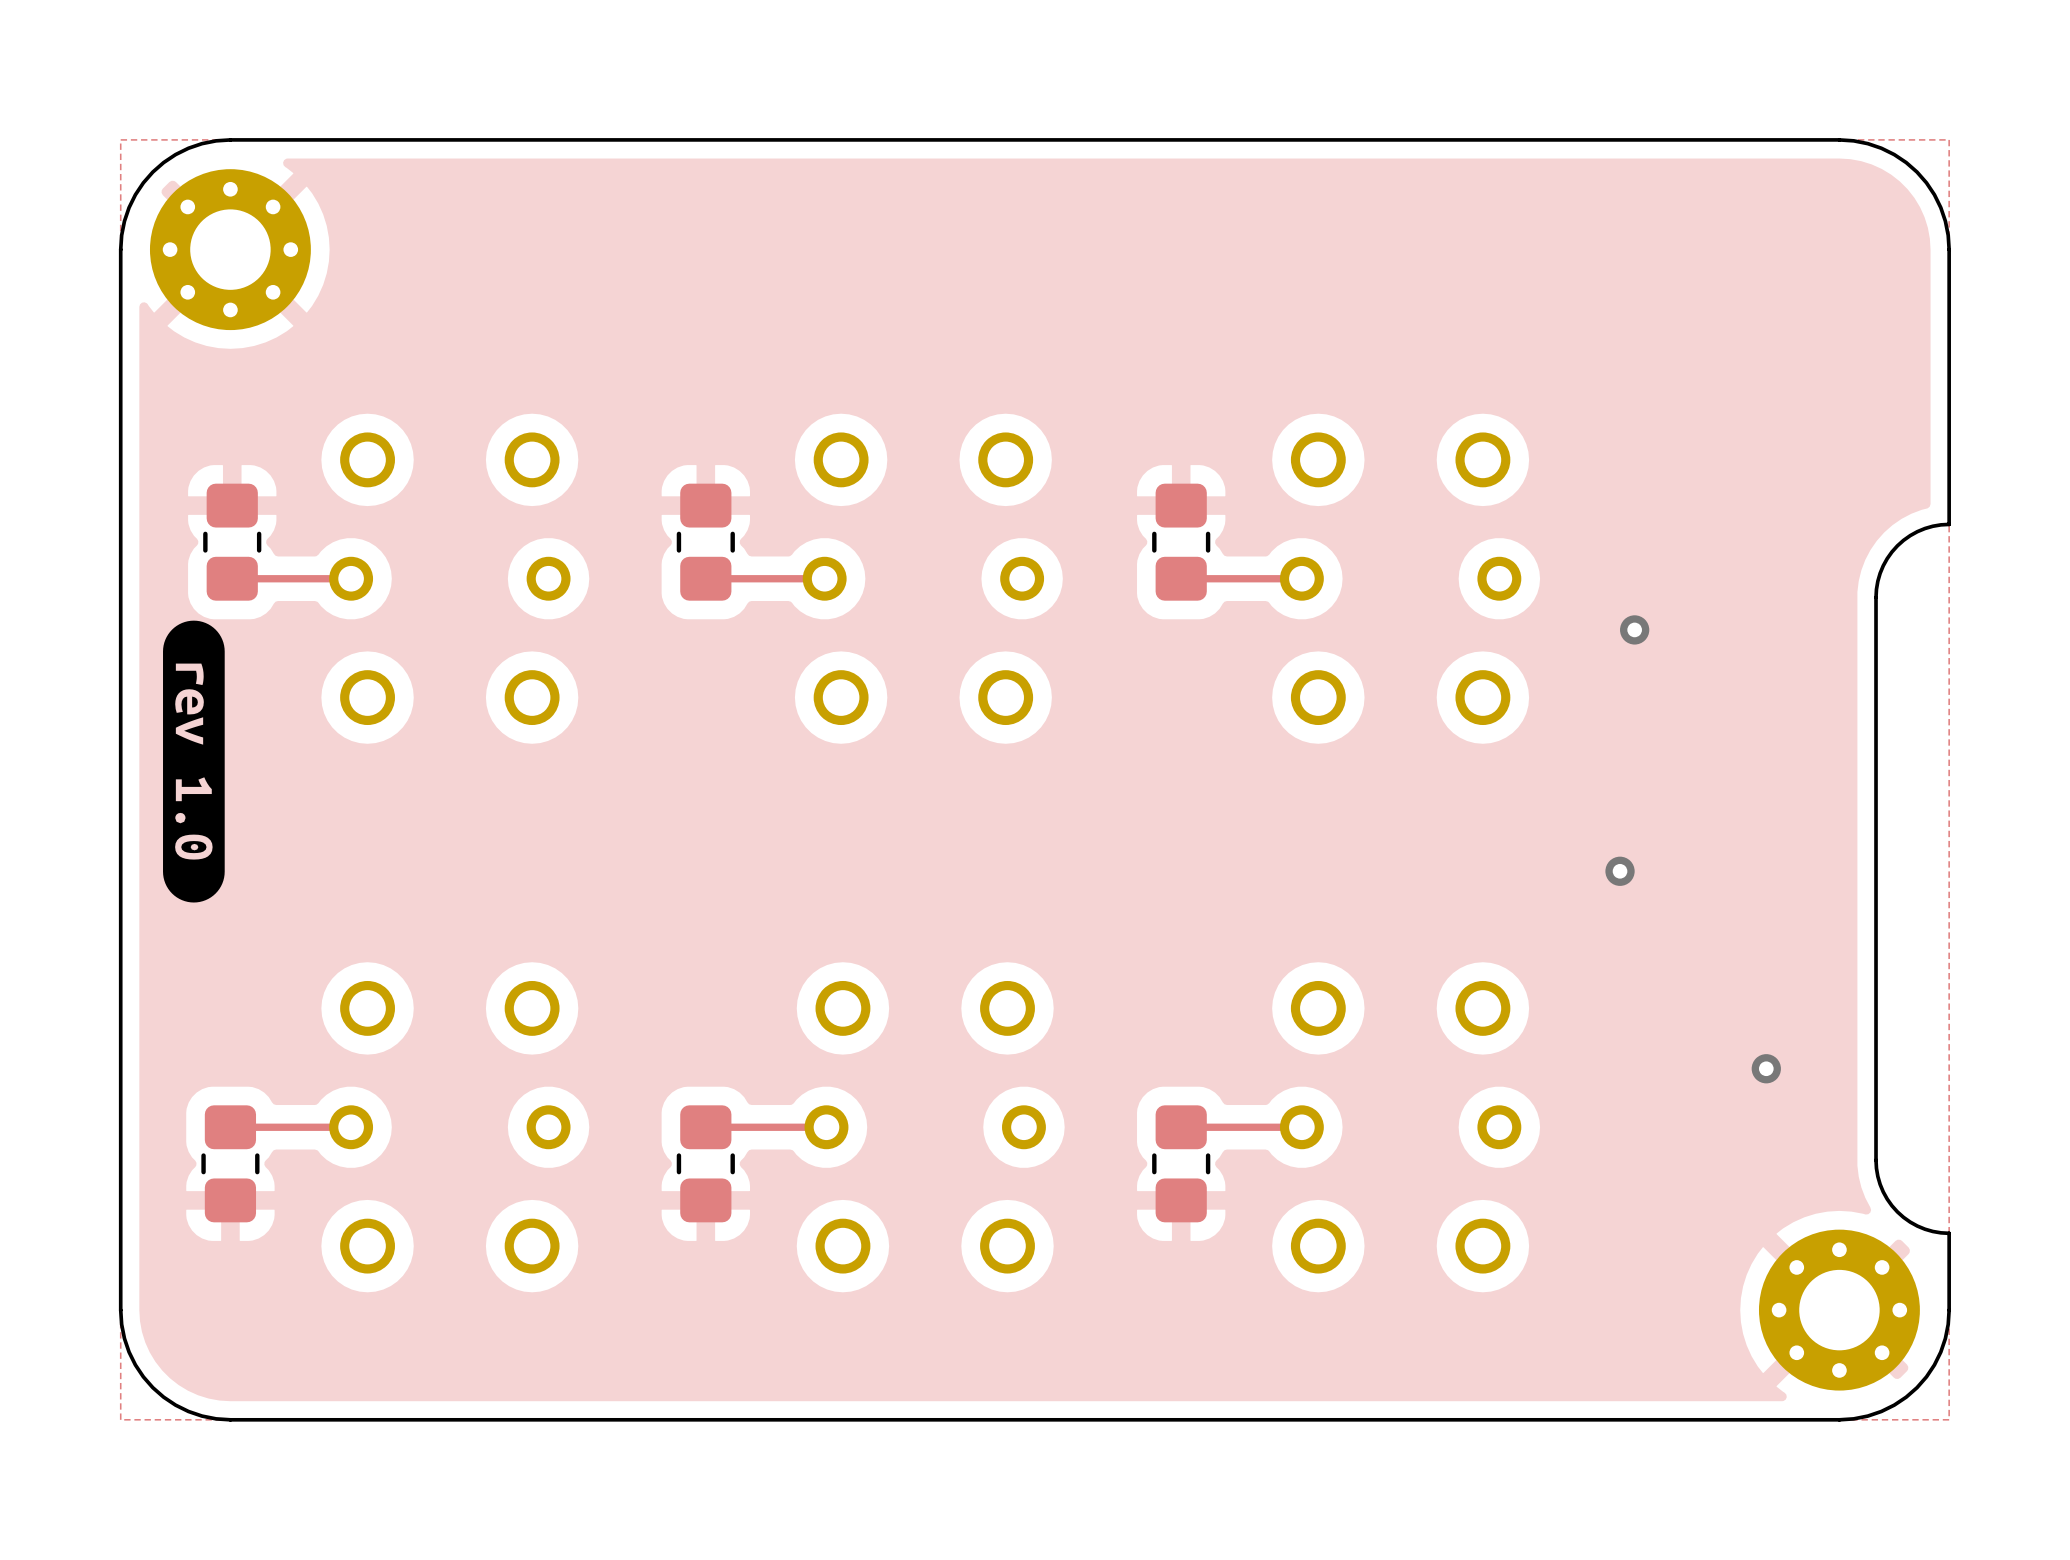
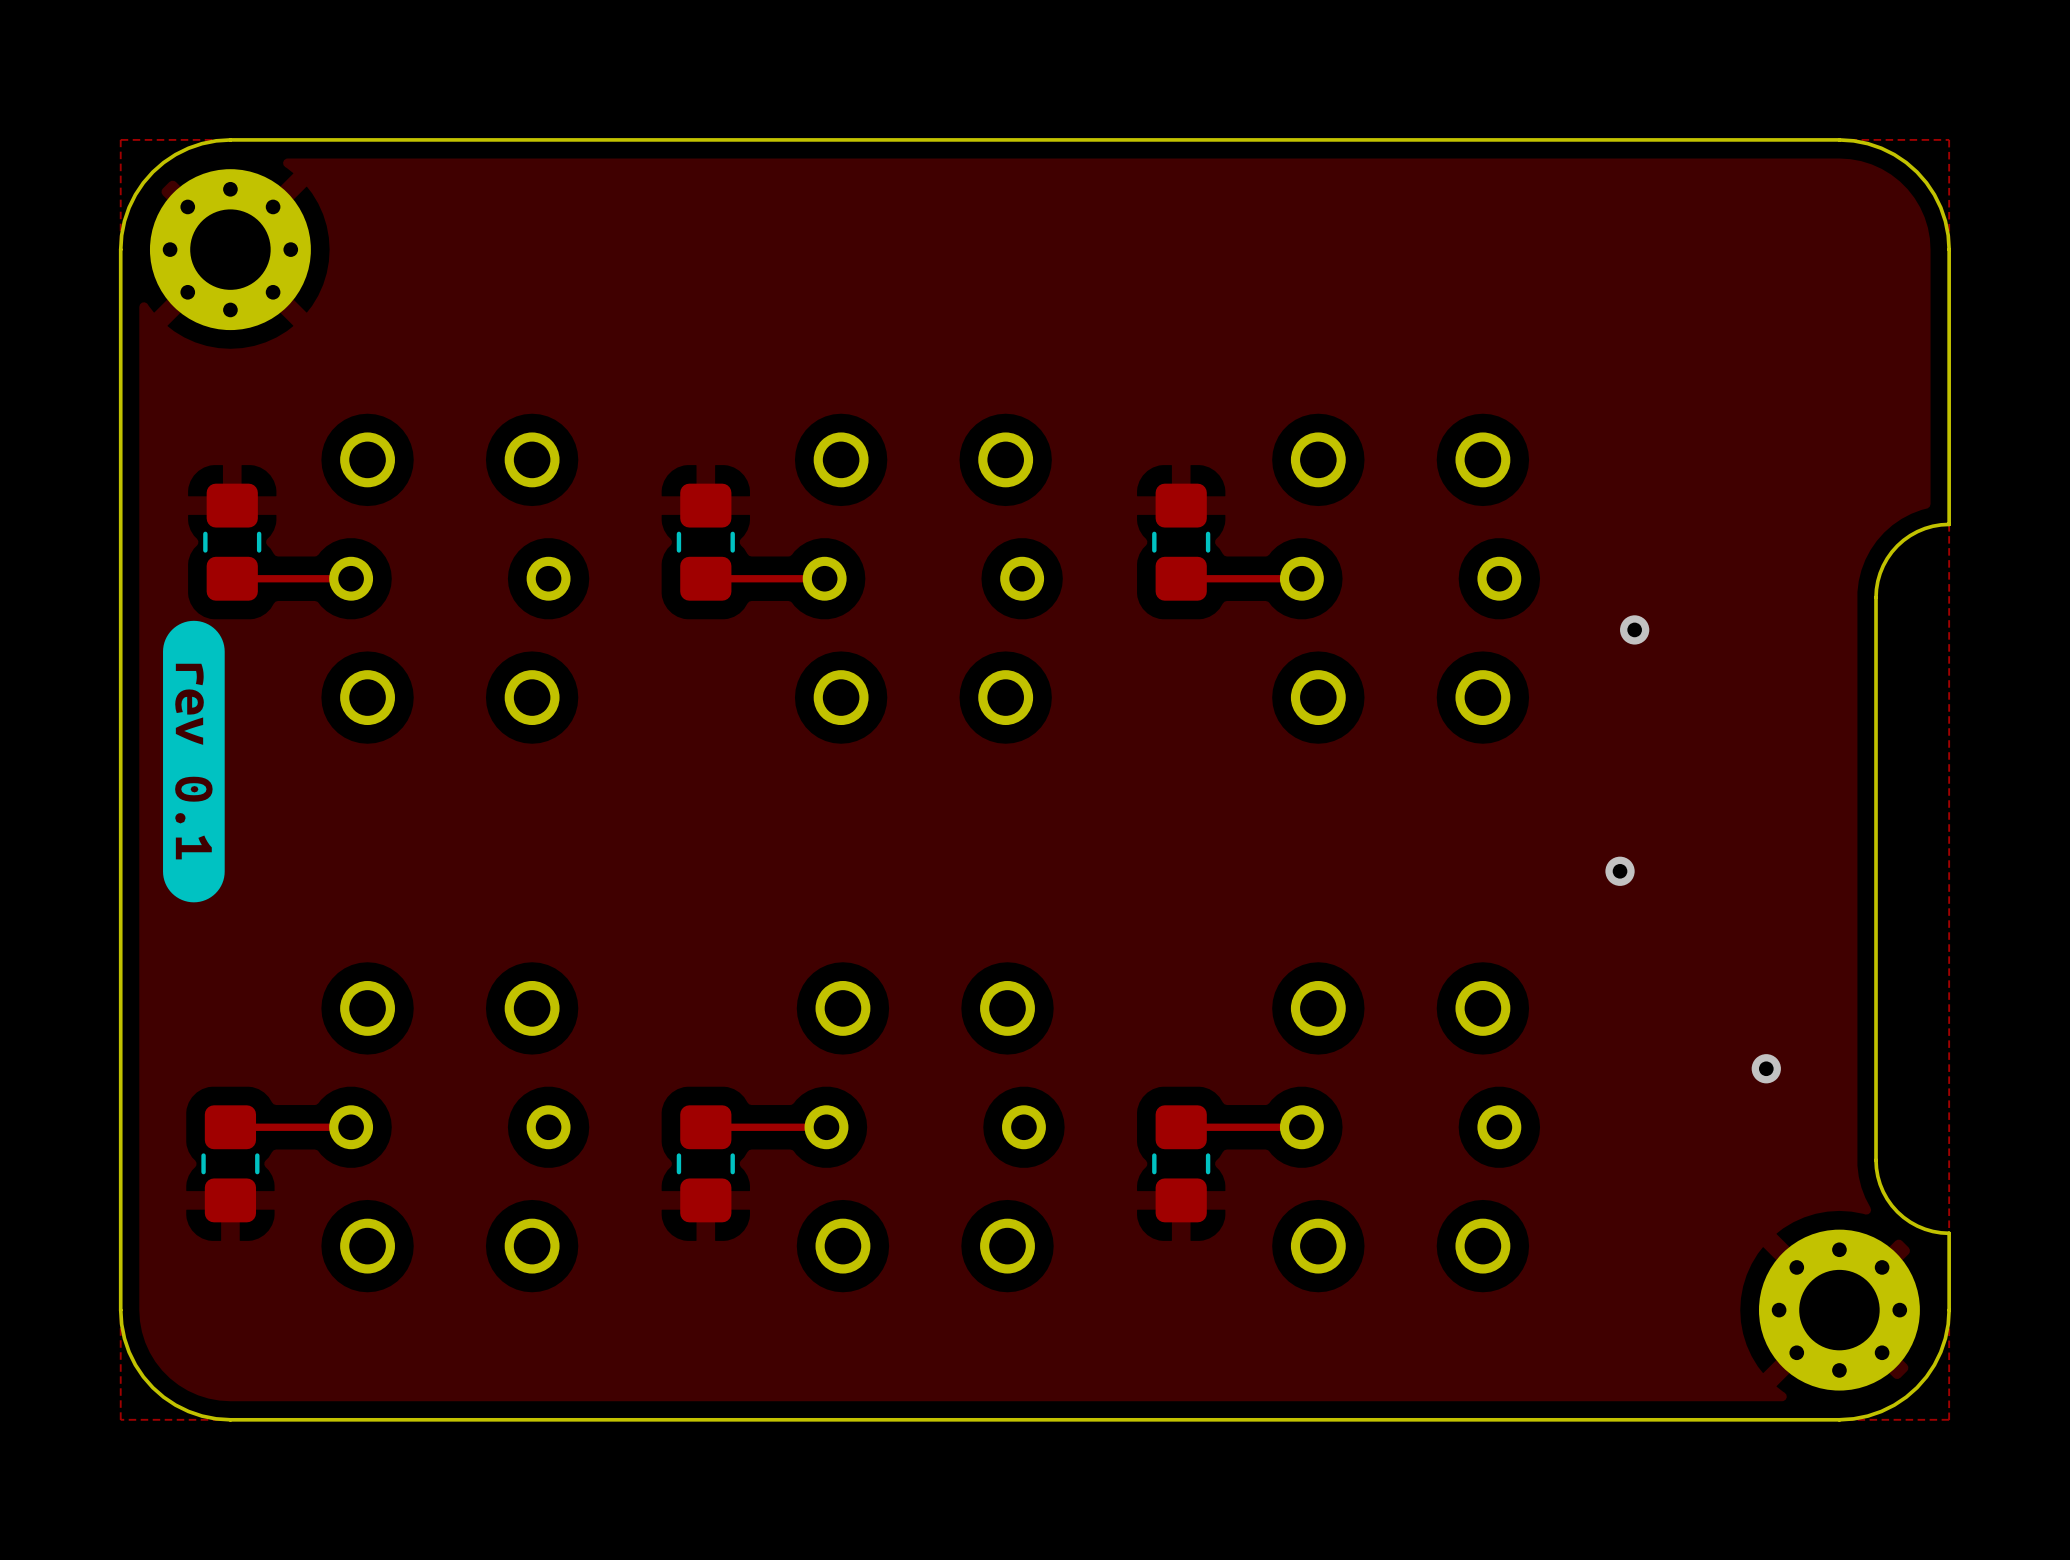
drawing shape: [163, 620, 225, 903] -> [163, 620, 225, 903]

